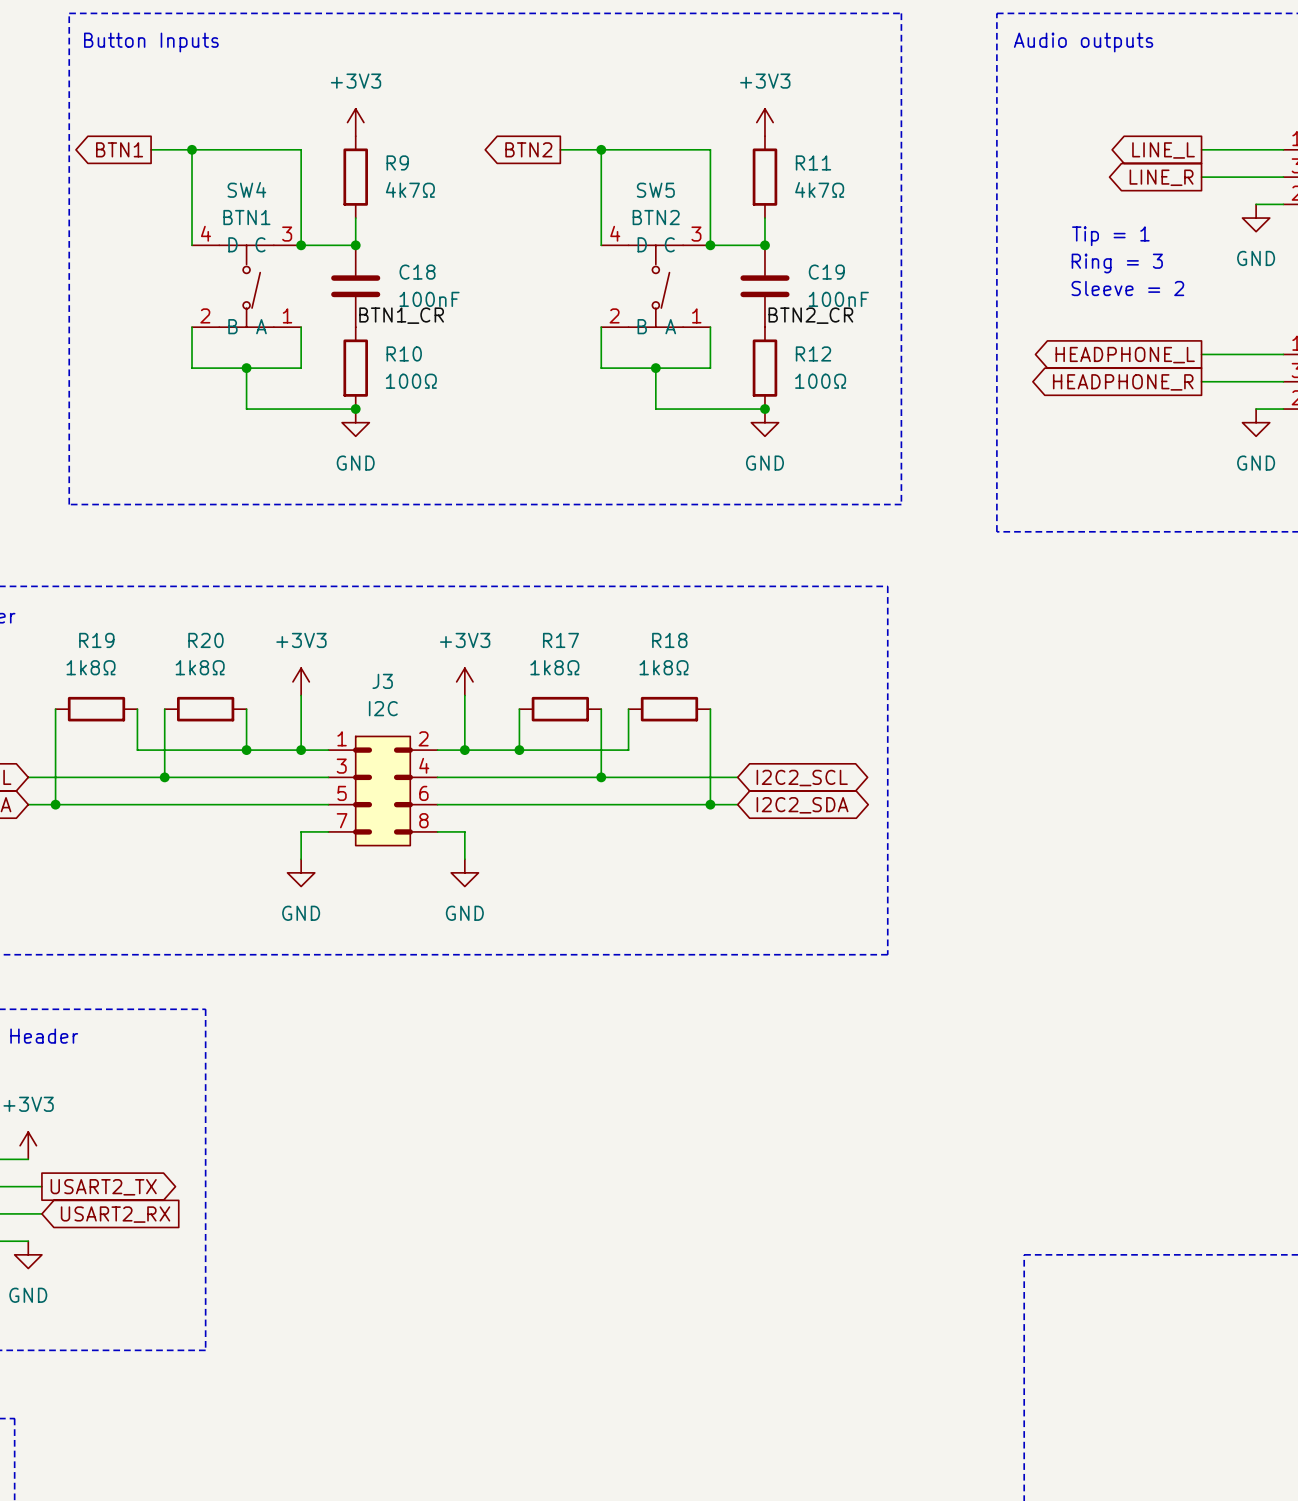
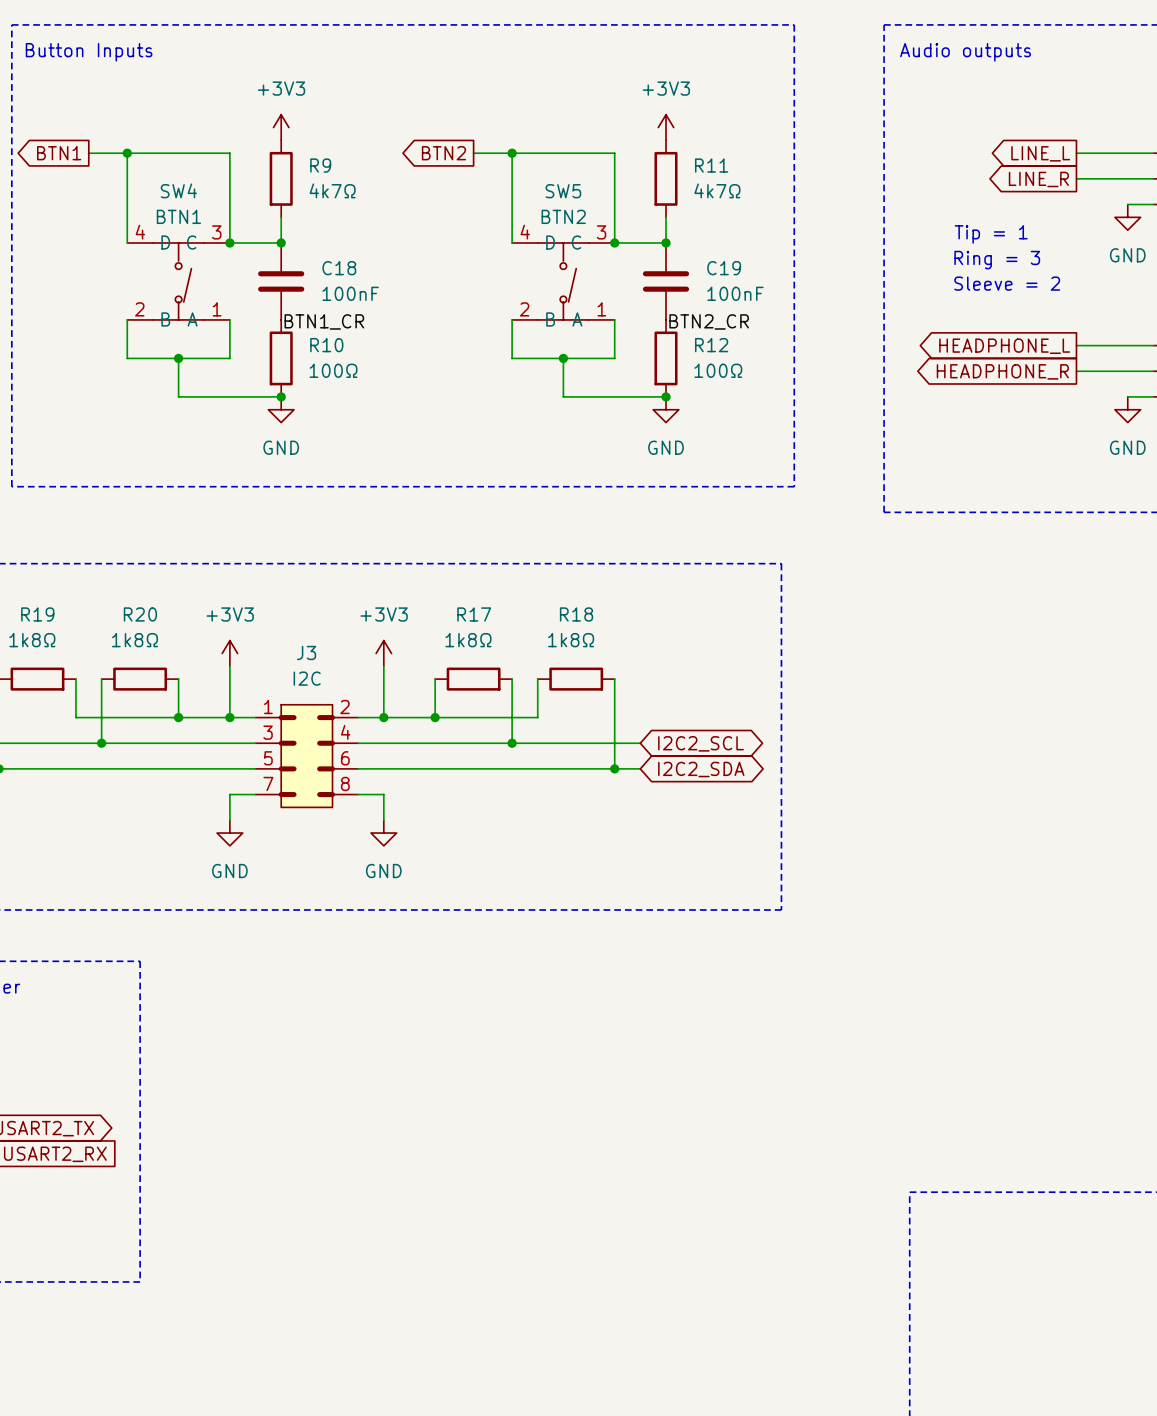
label position: BTN1_CR (401, 315) -> BTN1_CR (324, 321)
label position: BTN2_CR (810, 315) -> BTN2_CR (709, 321)

